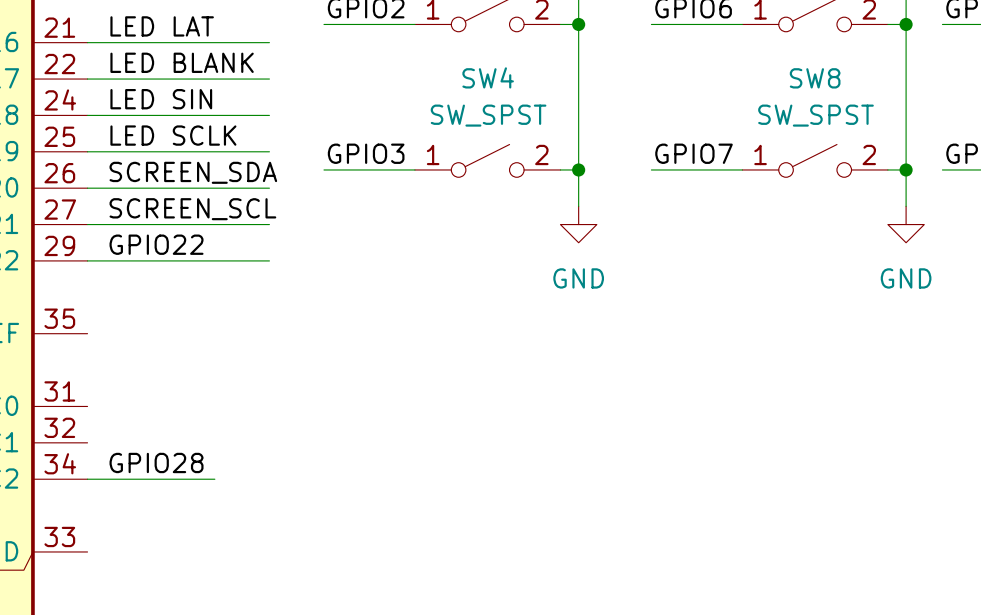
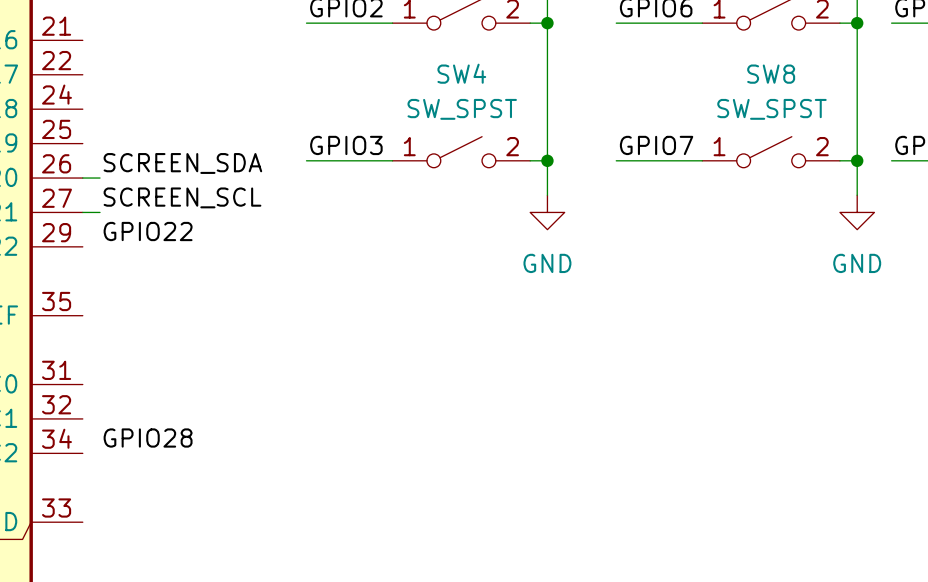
label: LED LAT (162, 26) -> none
wire: (87, 42) (269, 42) -> none
label: LED BLANK (182, 62) -> none
wire: (87, 79) (269, 79) -> none
label: LED SIN (161, 99) -> none
wire: (87, 115) (269, 115) -> none
label: LED SCLK (173, 135) -> none
wire: (87, 151) (269, 151) -> none
wire: (105, 188) (269, 188) -> none
wire: (105, 224) (269, 224) -> none
wire: (87, 260) (269, 260) -> none
wire: (87, 479) (214, 479) -> none

